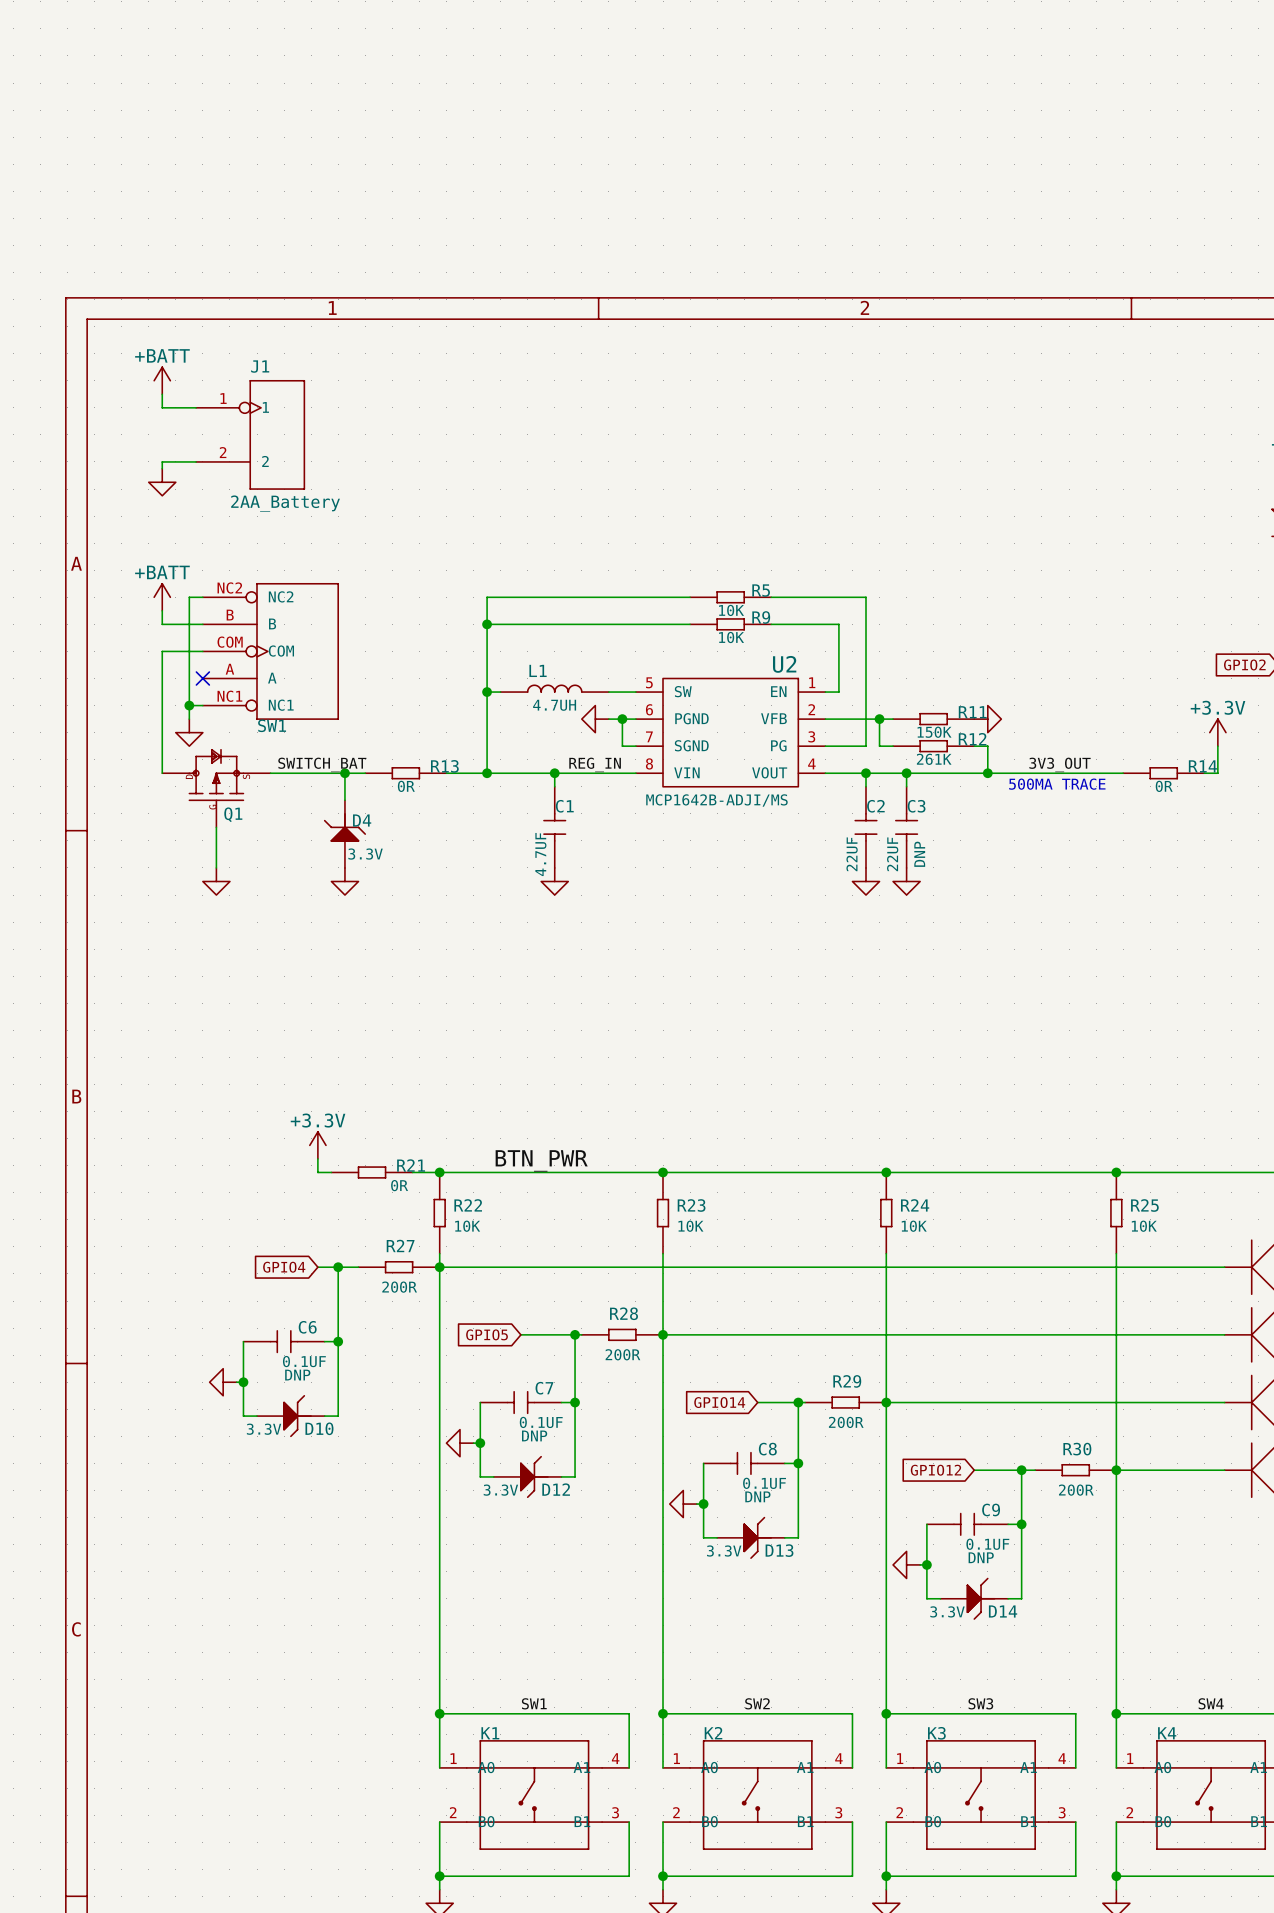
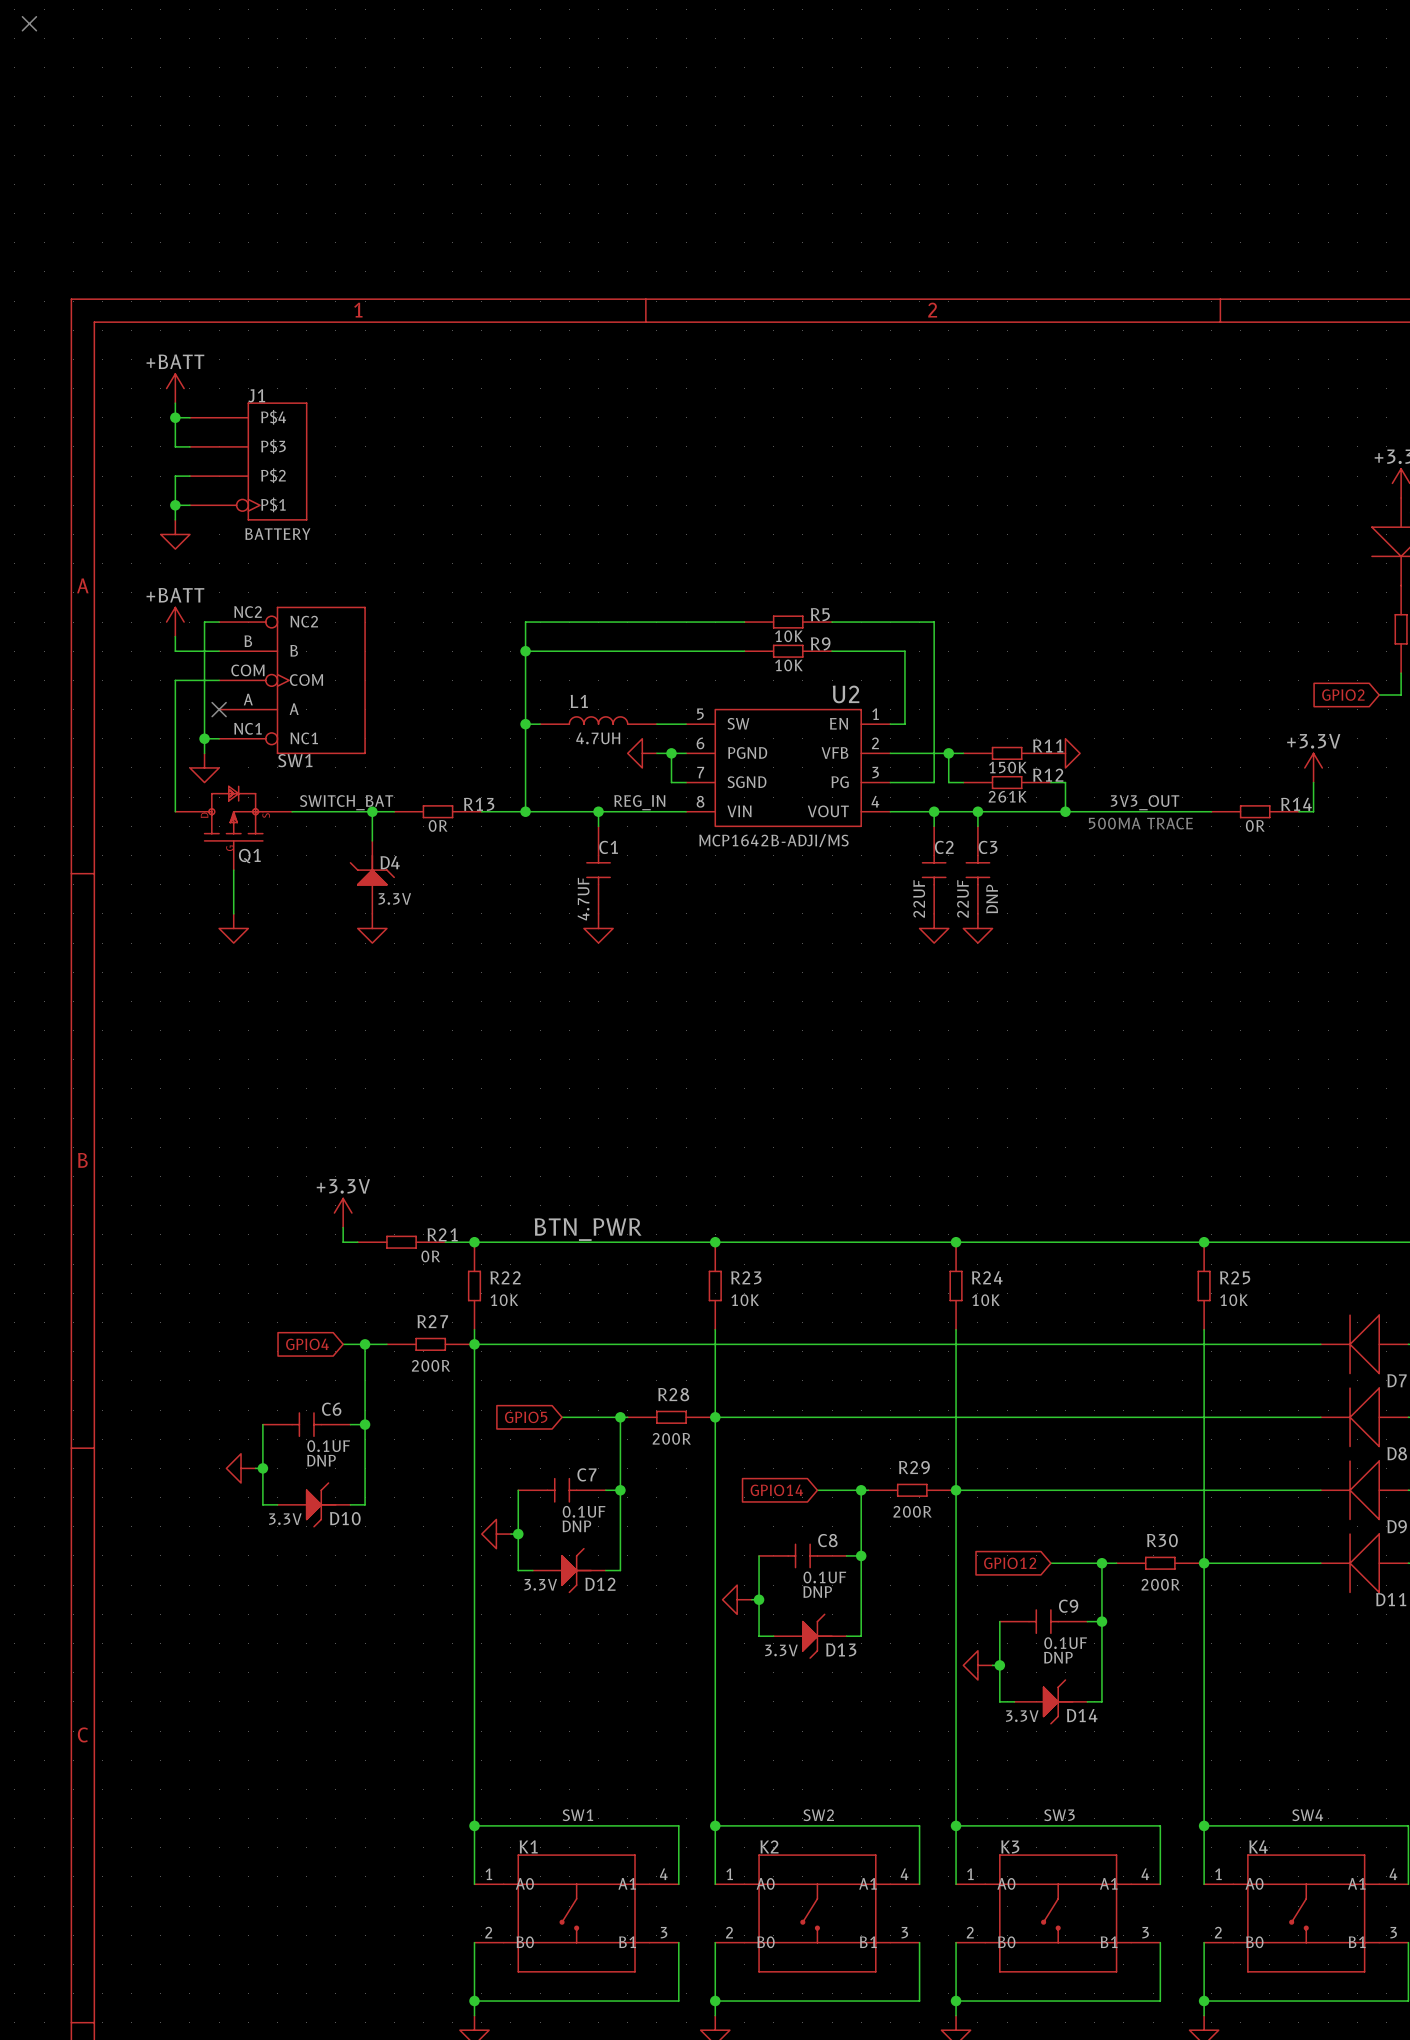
no-connect mark: none -> (29, 23)
J1 symbol: [196, 380, 305, 490] -> [189, 403, 307, 520]
wire: none -> (175, 417) (175, 446) (189, 446)
junction: none -> (175, 417)
wire: none -> (175, 483) (175, 519)
power symbol position: (162, 482) -> (175, 534)
wire: none -> (175, 505) (189, 505)
junction: none -> (175, 505)
J1 value: 2AA_Battery (285, 503) -> none
J1 text: none -> BATTERY (277, 534)

